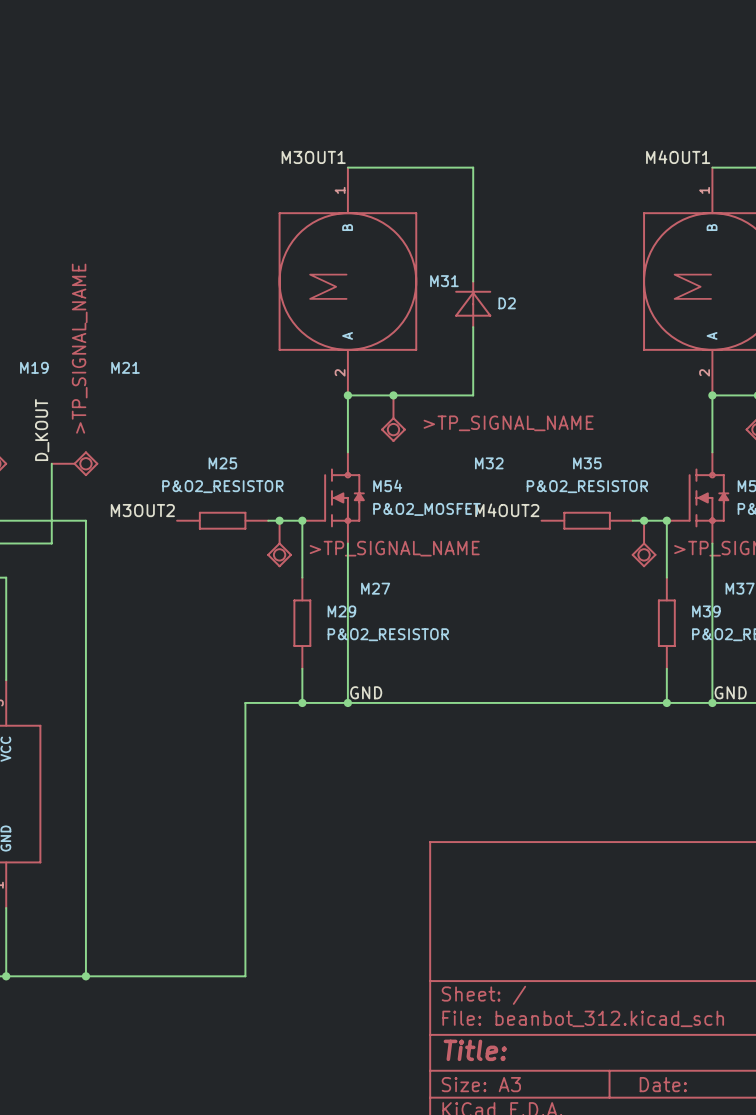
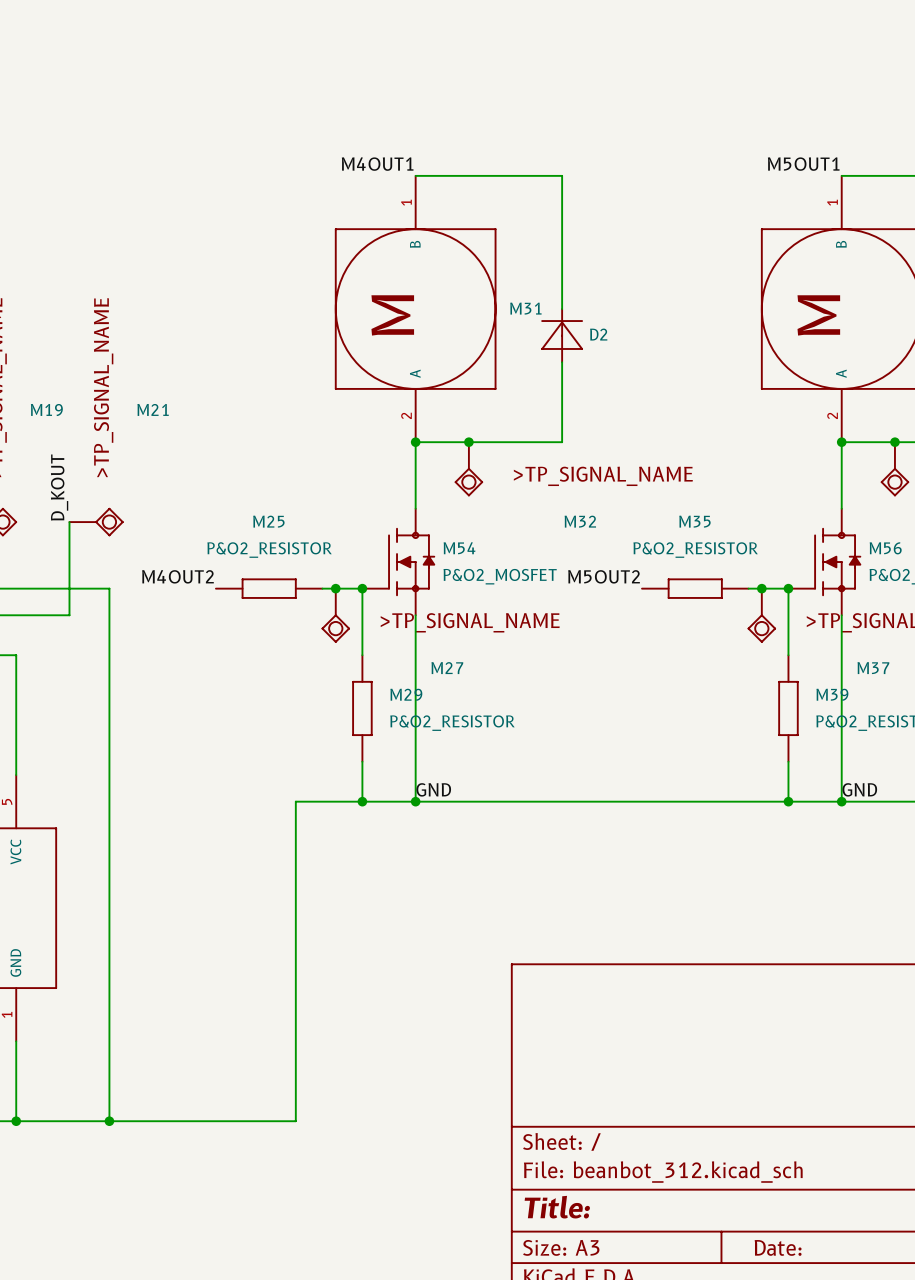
label: M3OUT1 (313, 157) -> M4OUT1 (377, 164)
label: M4OUT1 (678, 157) -> M5OUT1 (803, 164)
label: M3OUT2 (142, 510) -> M4OUT2 (177, 576)
label: M4OUT2 (507, 510) -> M5OUT2 (604, 576)

